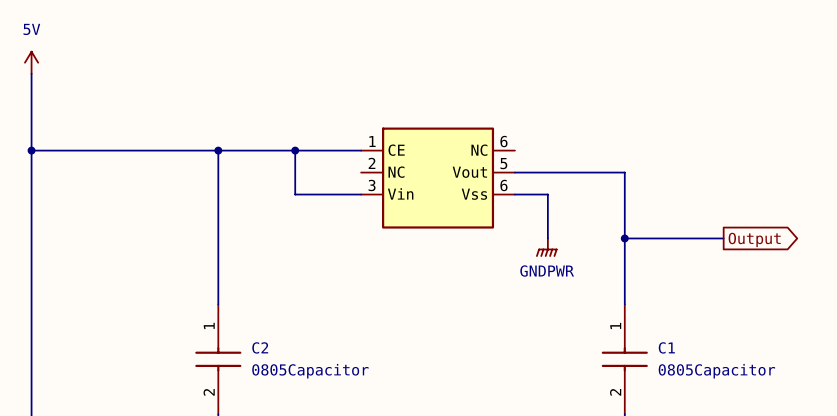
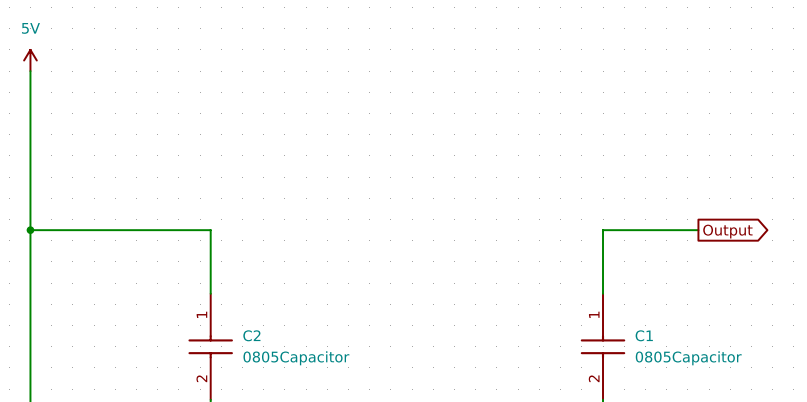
wire: (31, 150) (361, 150) -> none
junction: (31, 150) -> none
wire: (218, 150) (218, 238) -> (30, 230) (210, 230)
junction: (218, 150) -> none
wire: (295, 150) (295, 194) (361, 194) -> none
junction: (295, 150) -> none
wire: (514, 172) (624, 172) (624, 238) -> none
part: (438, 178) -> none
wire: (514, 194) (547, 194) (547, 238) -> none
junction: none -> (30, 230)
junction: (624, 238) -> none
power symbol: GNDPWR (546, 247) -> none

